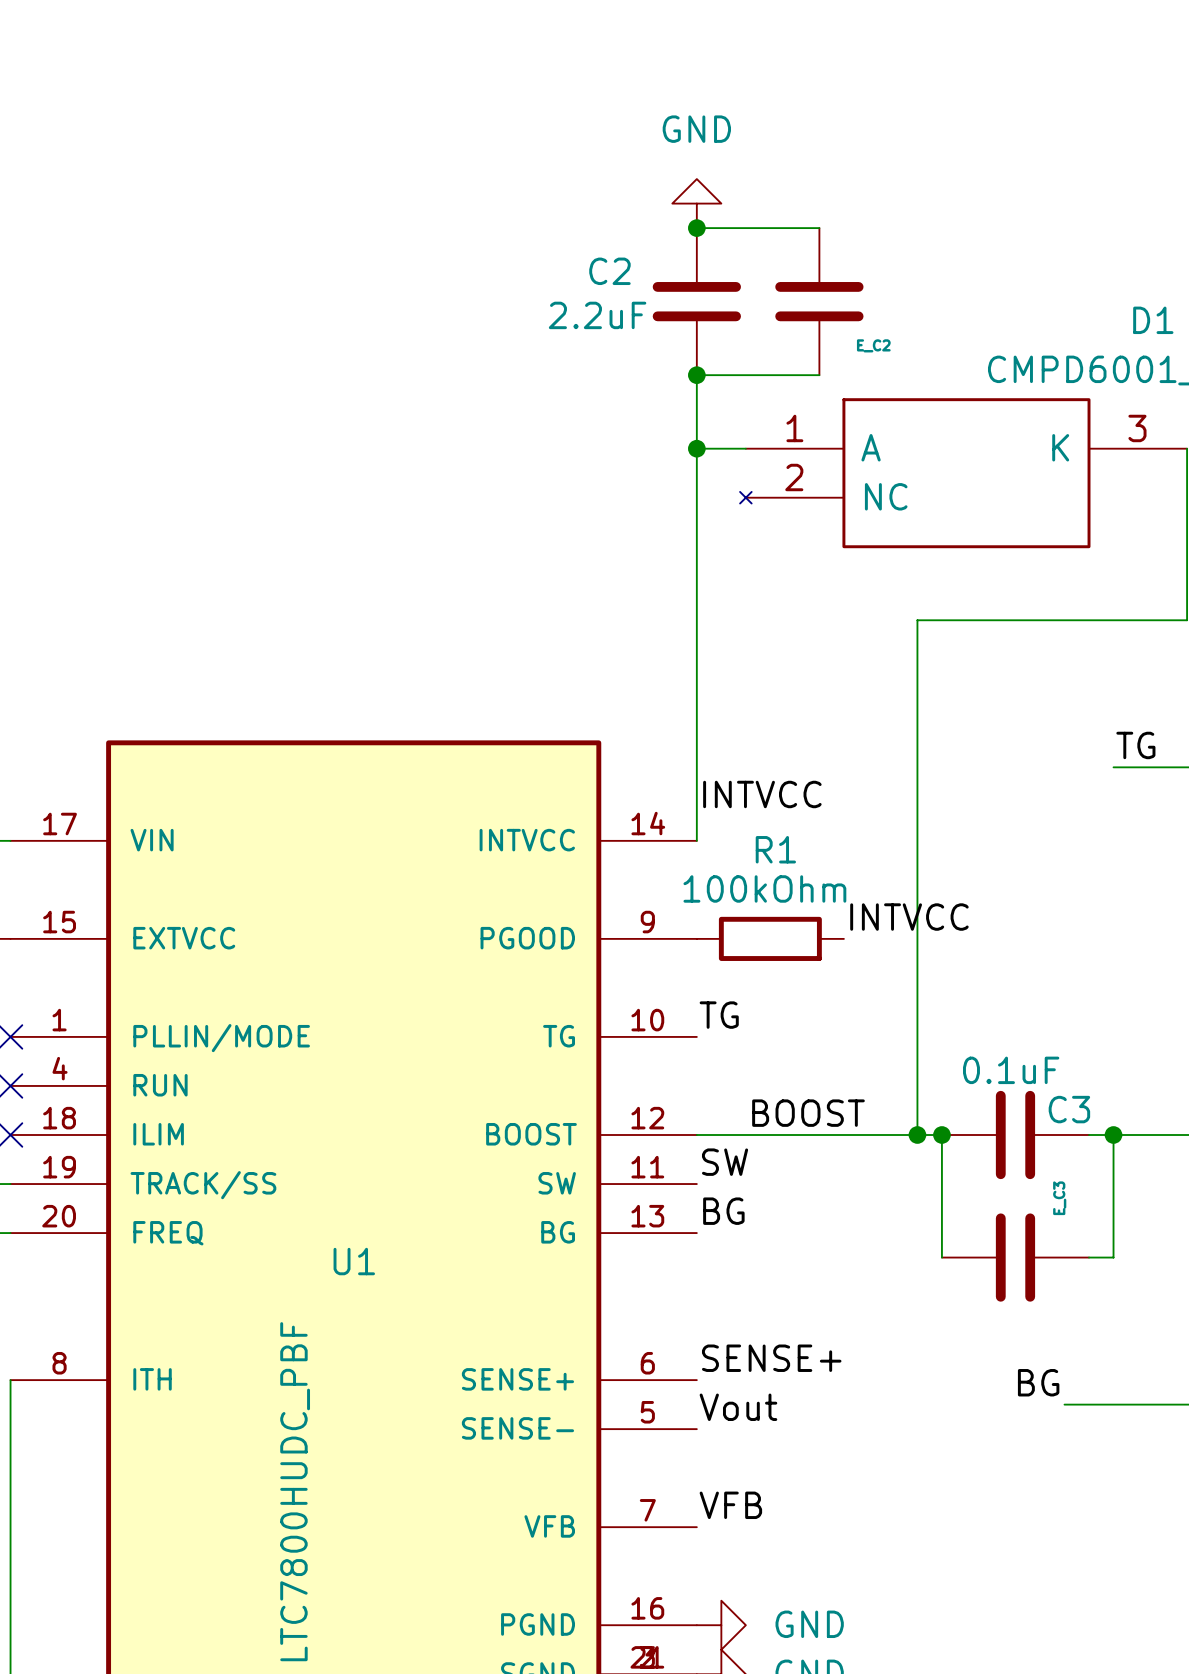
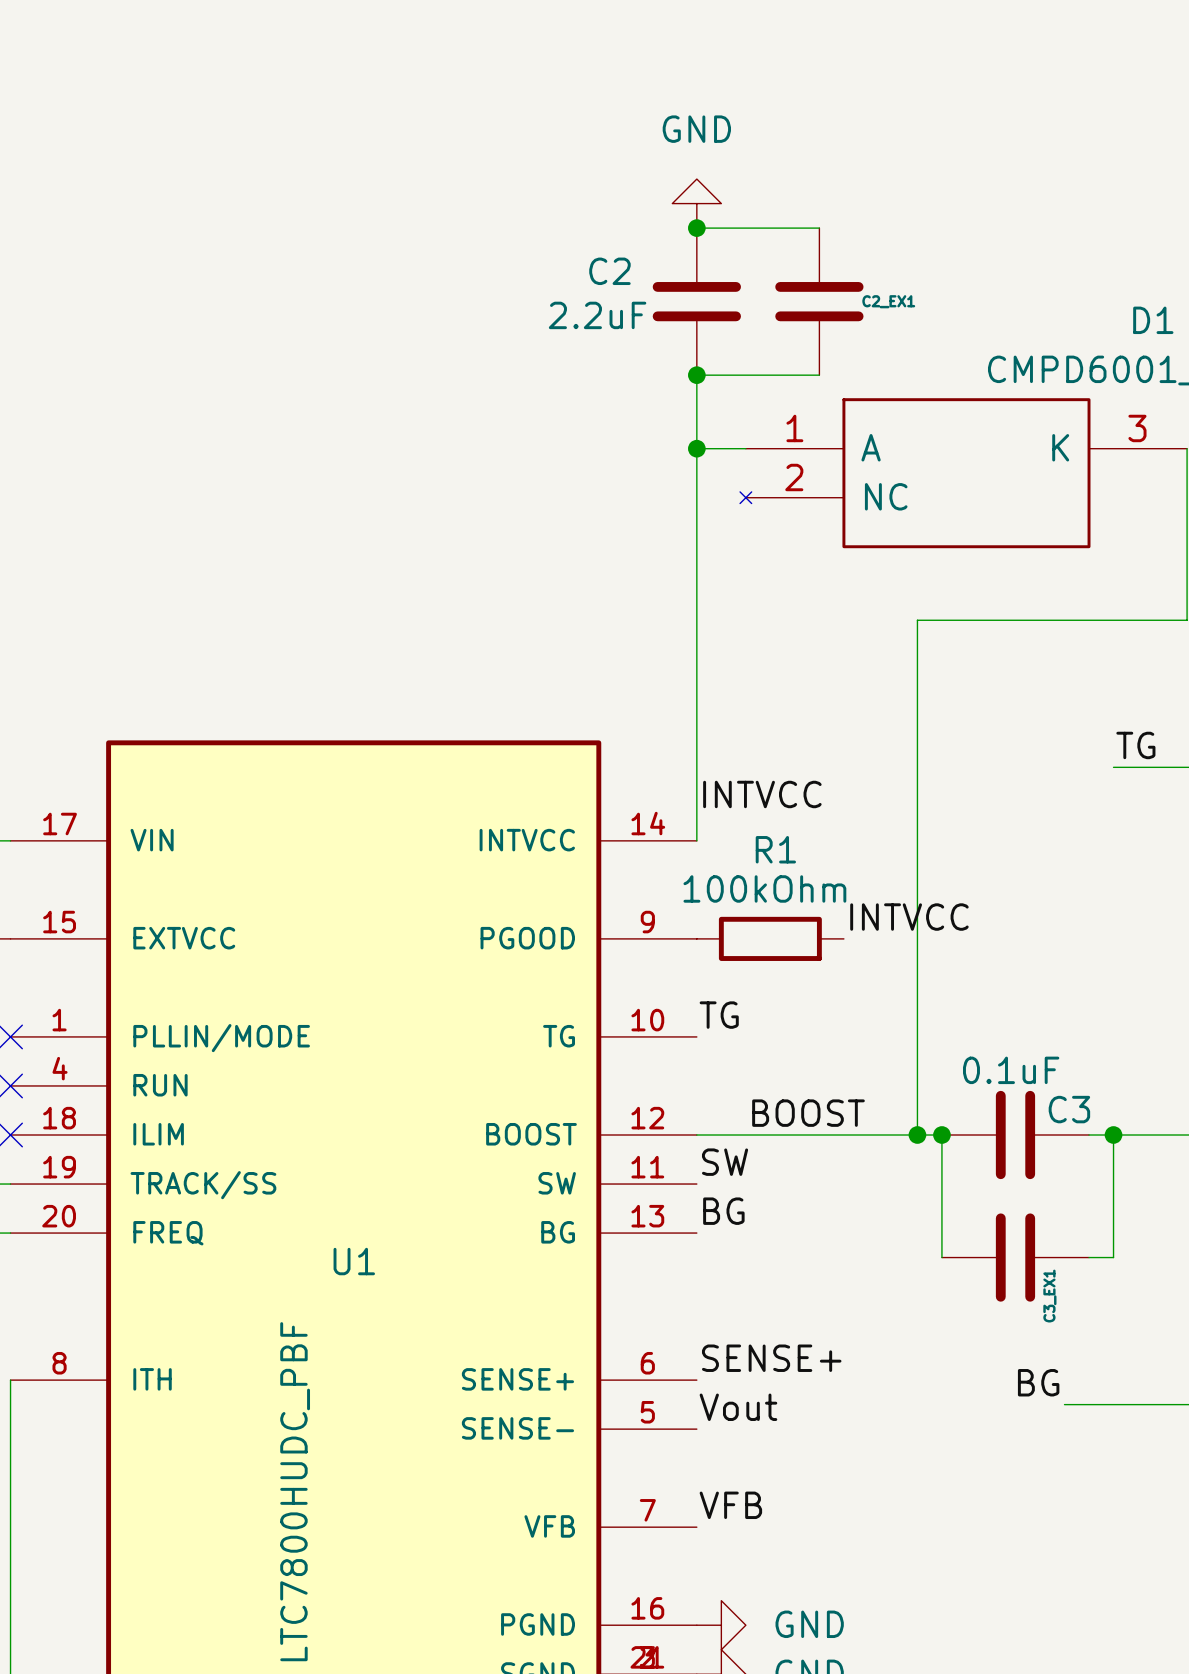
E_C2 name: E_C2 (873, 345) -> C2_EX1 (888, 301)
E_C3 name: E_C3 (1059, 1198) -> C3_EX1 (1049, 1296)

